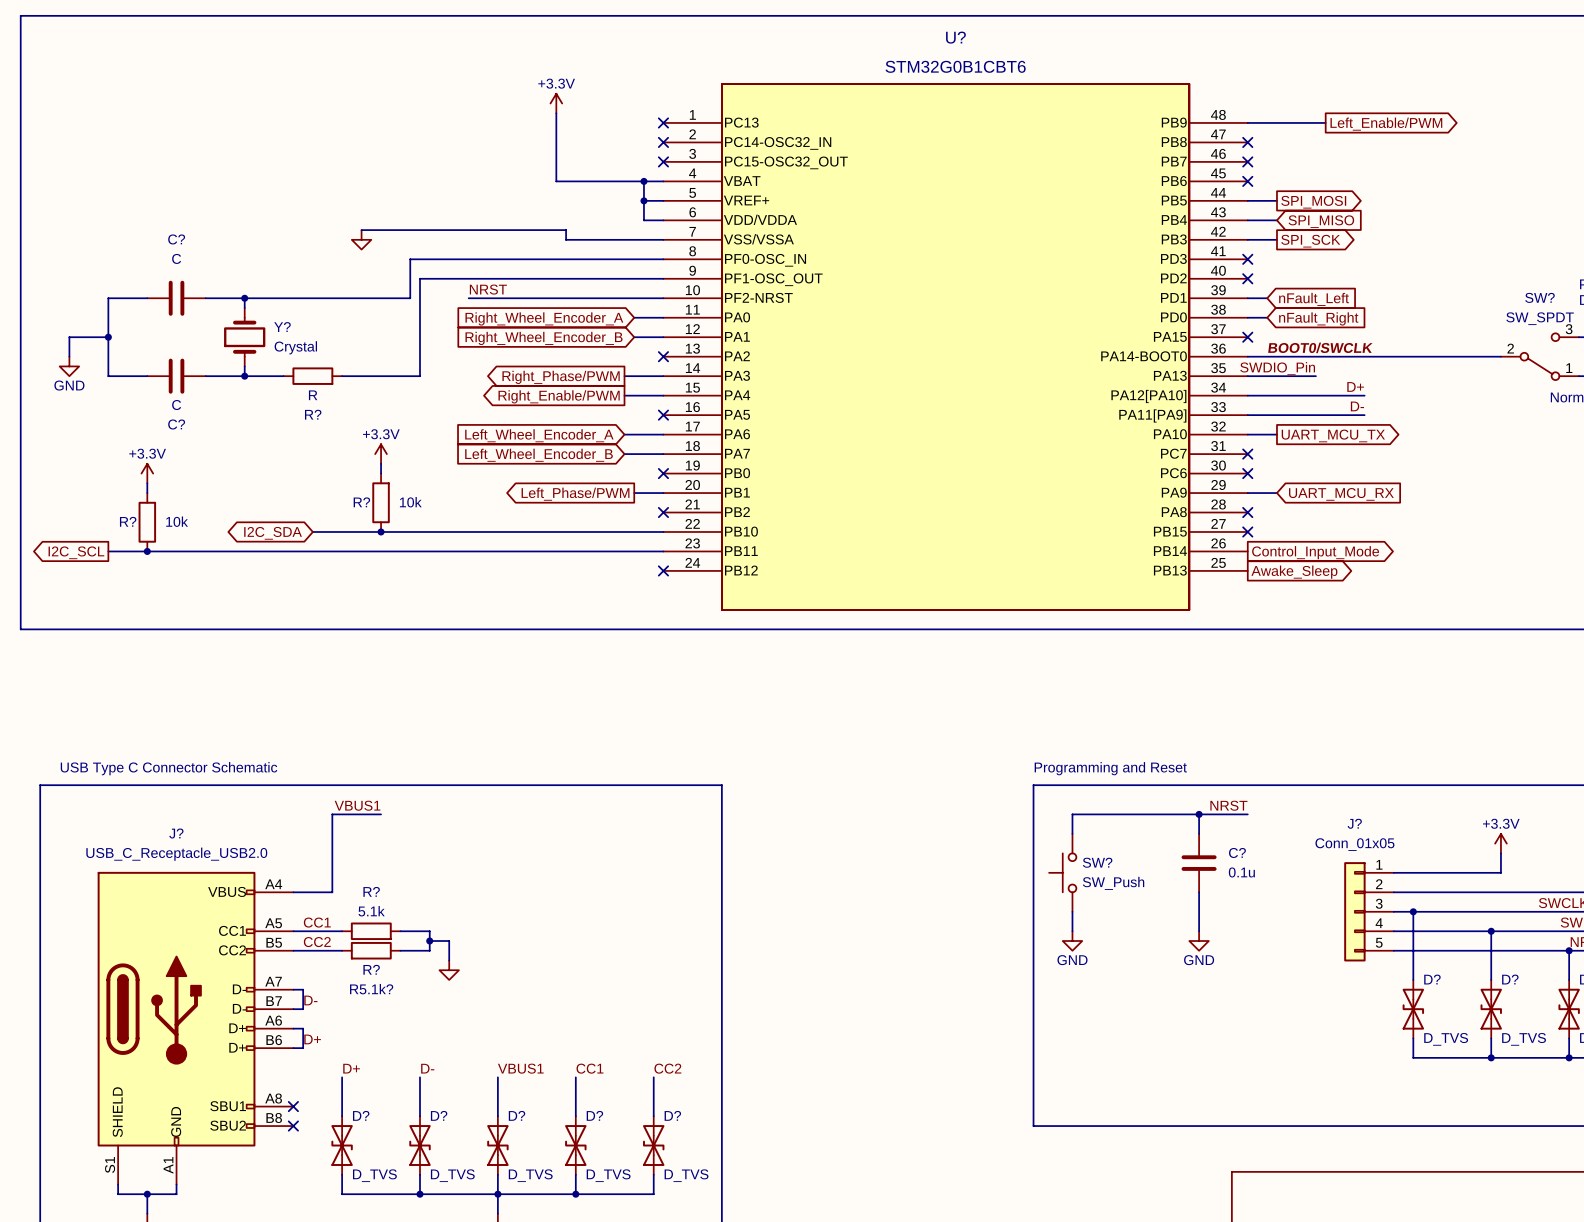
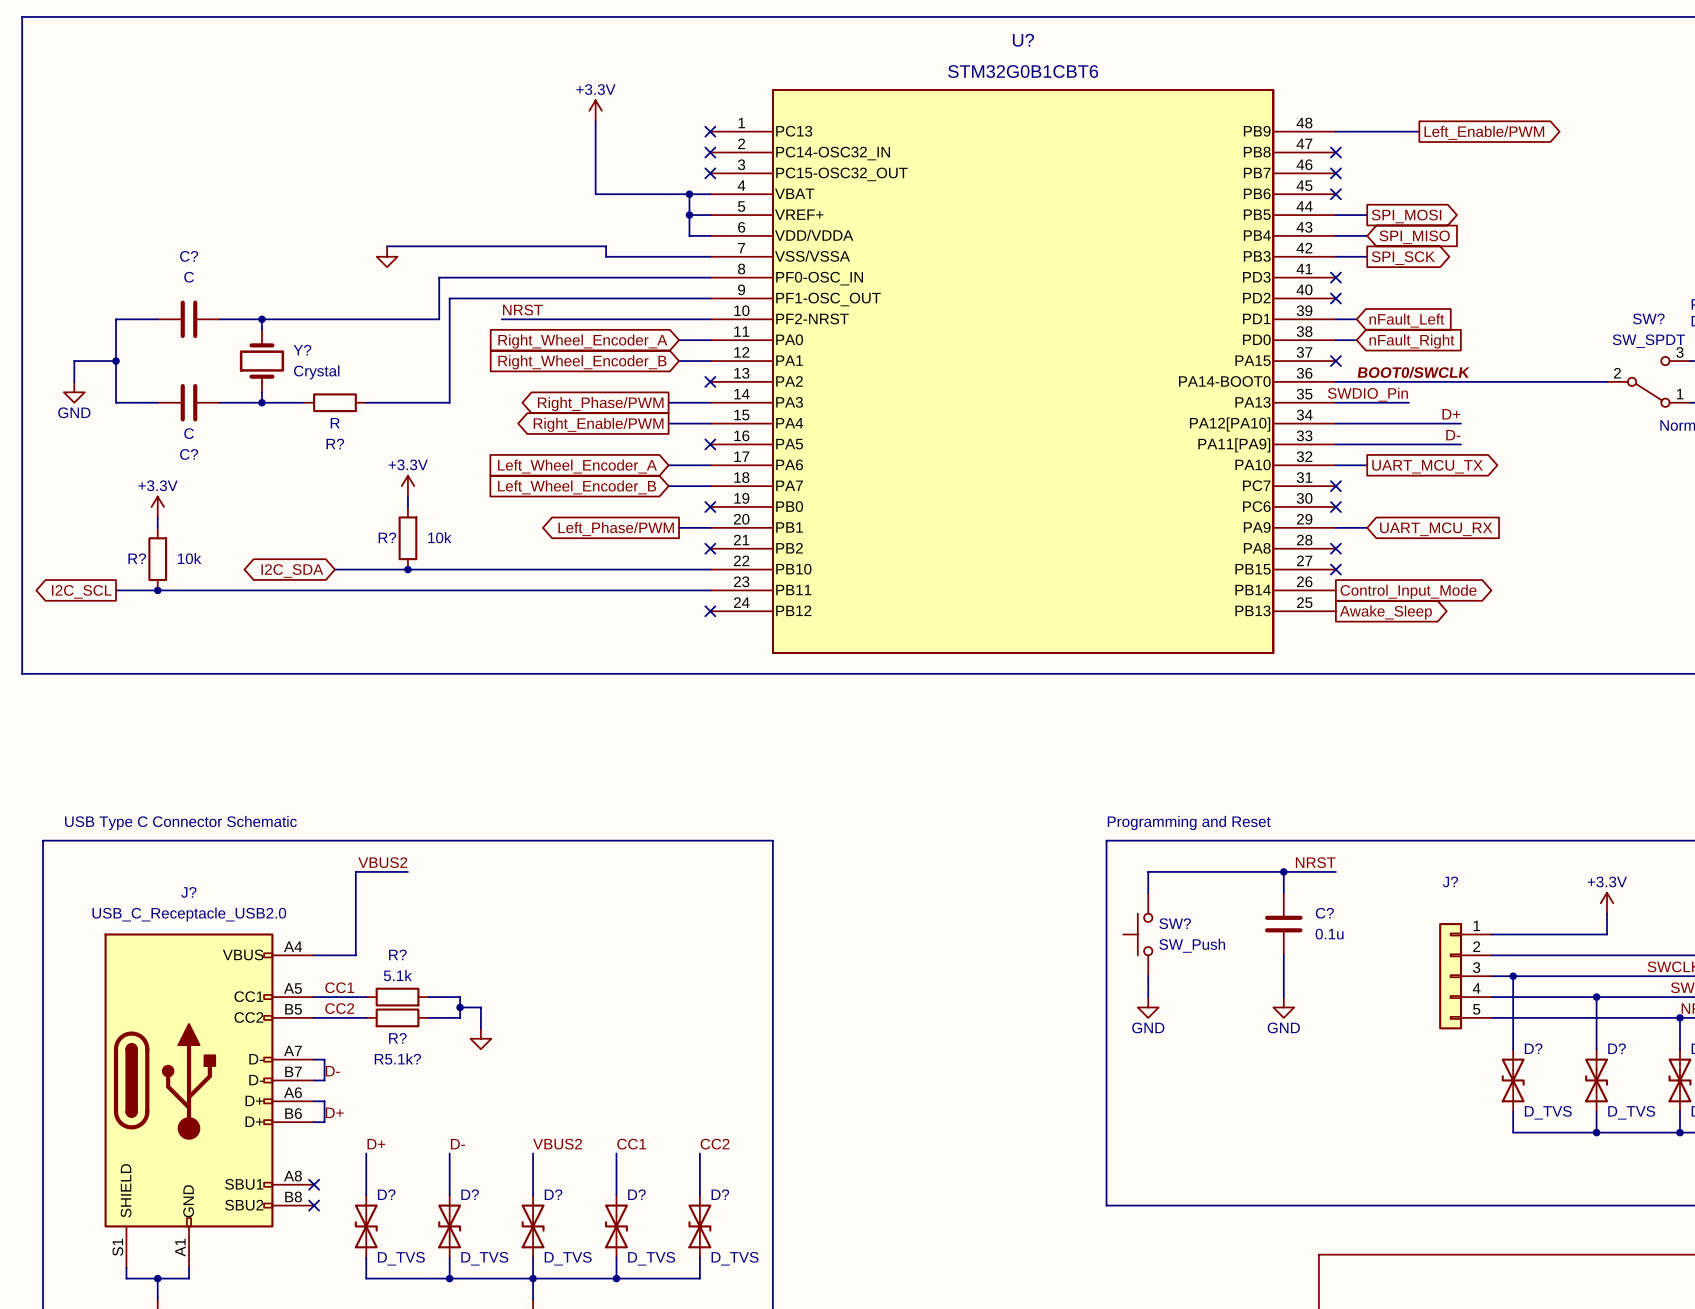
label: VBUS1 (357, 805) -> VBUS2 (382, 862)
J? value: Conn_01x05 (1354, 844) -> none
label: VBUS1 (520, 1068) -> VBUS2 (557, 1144)

